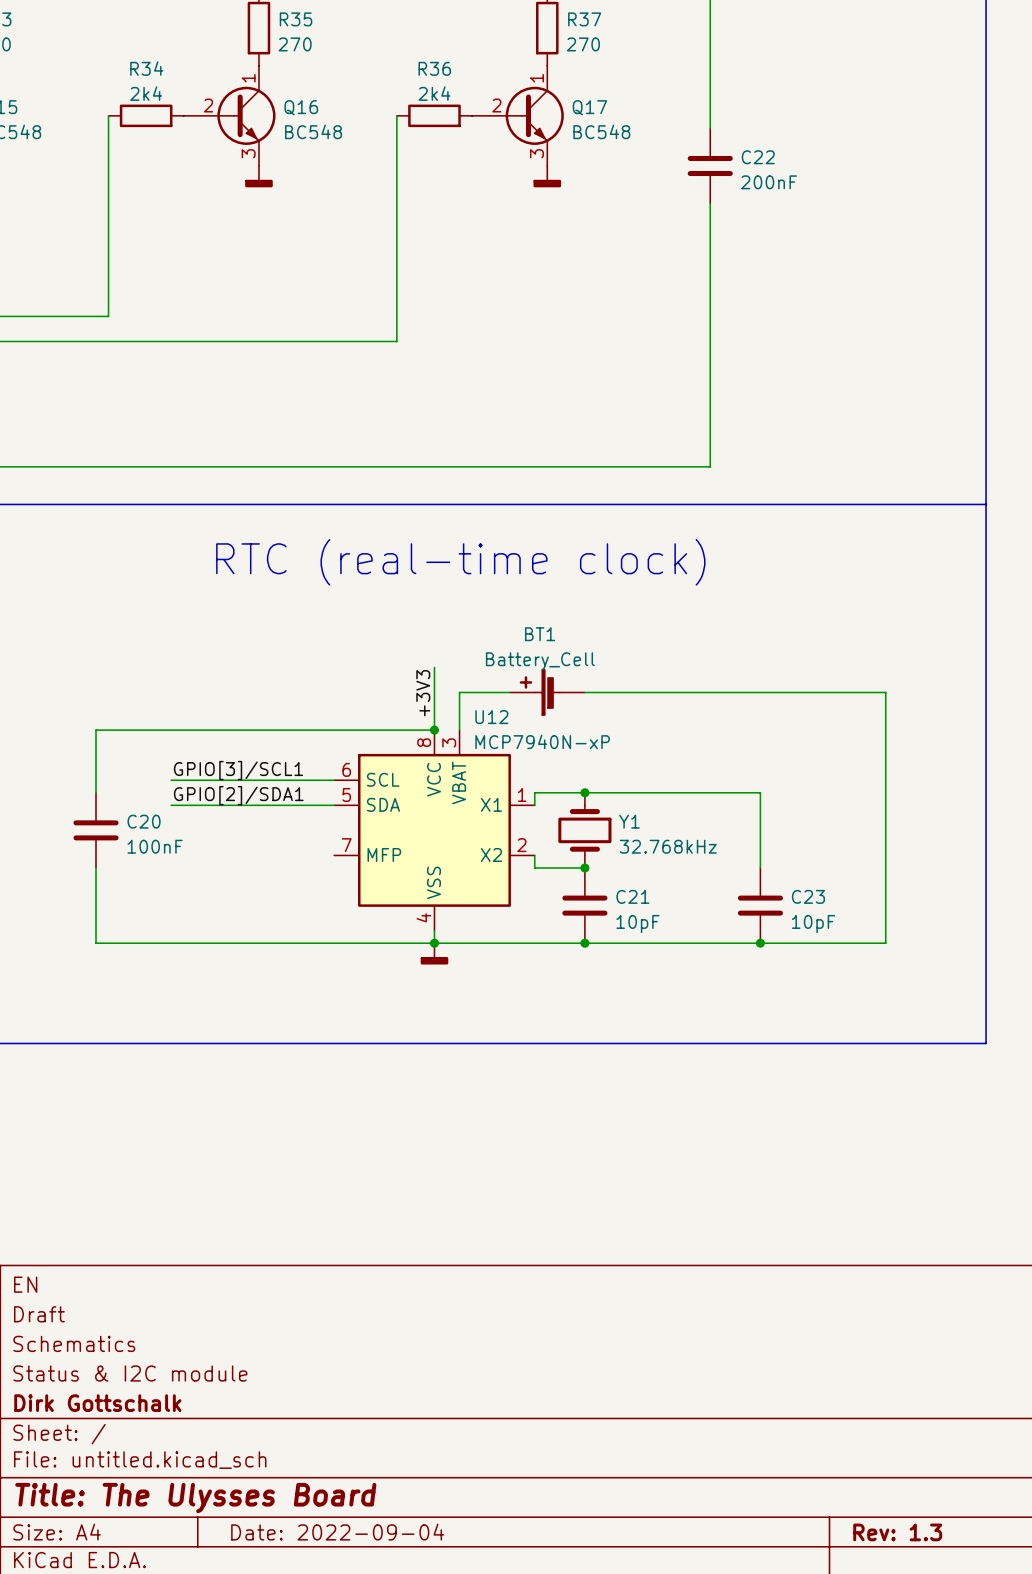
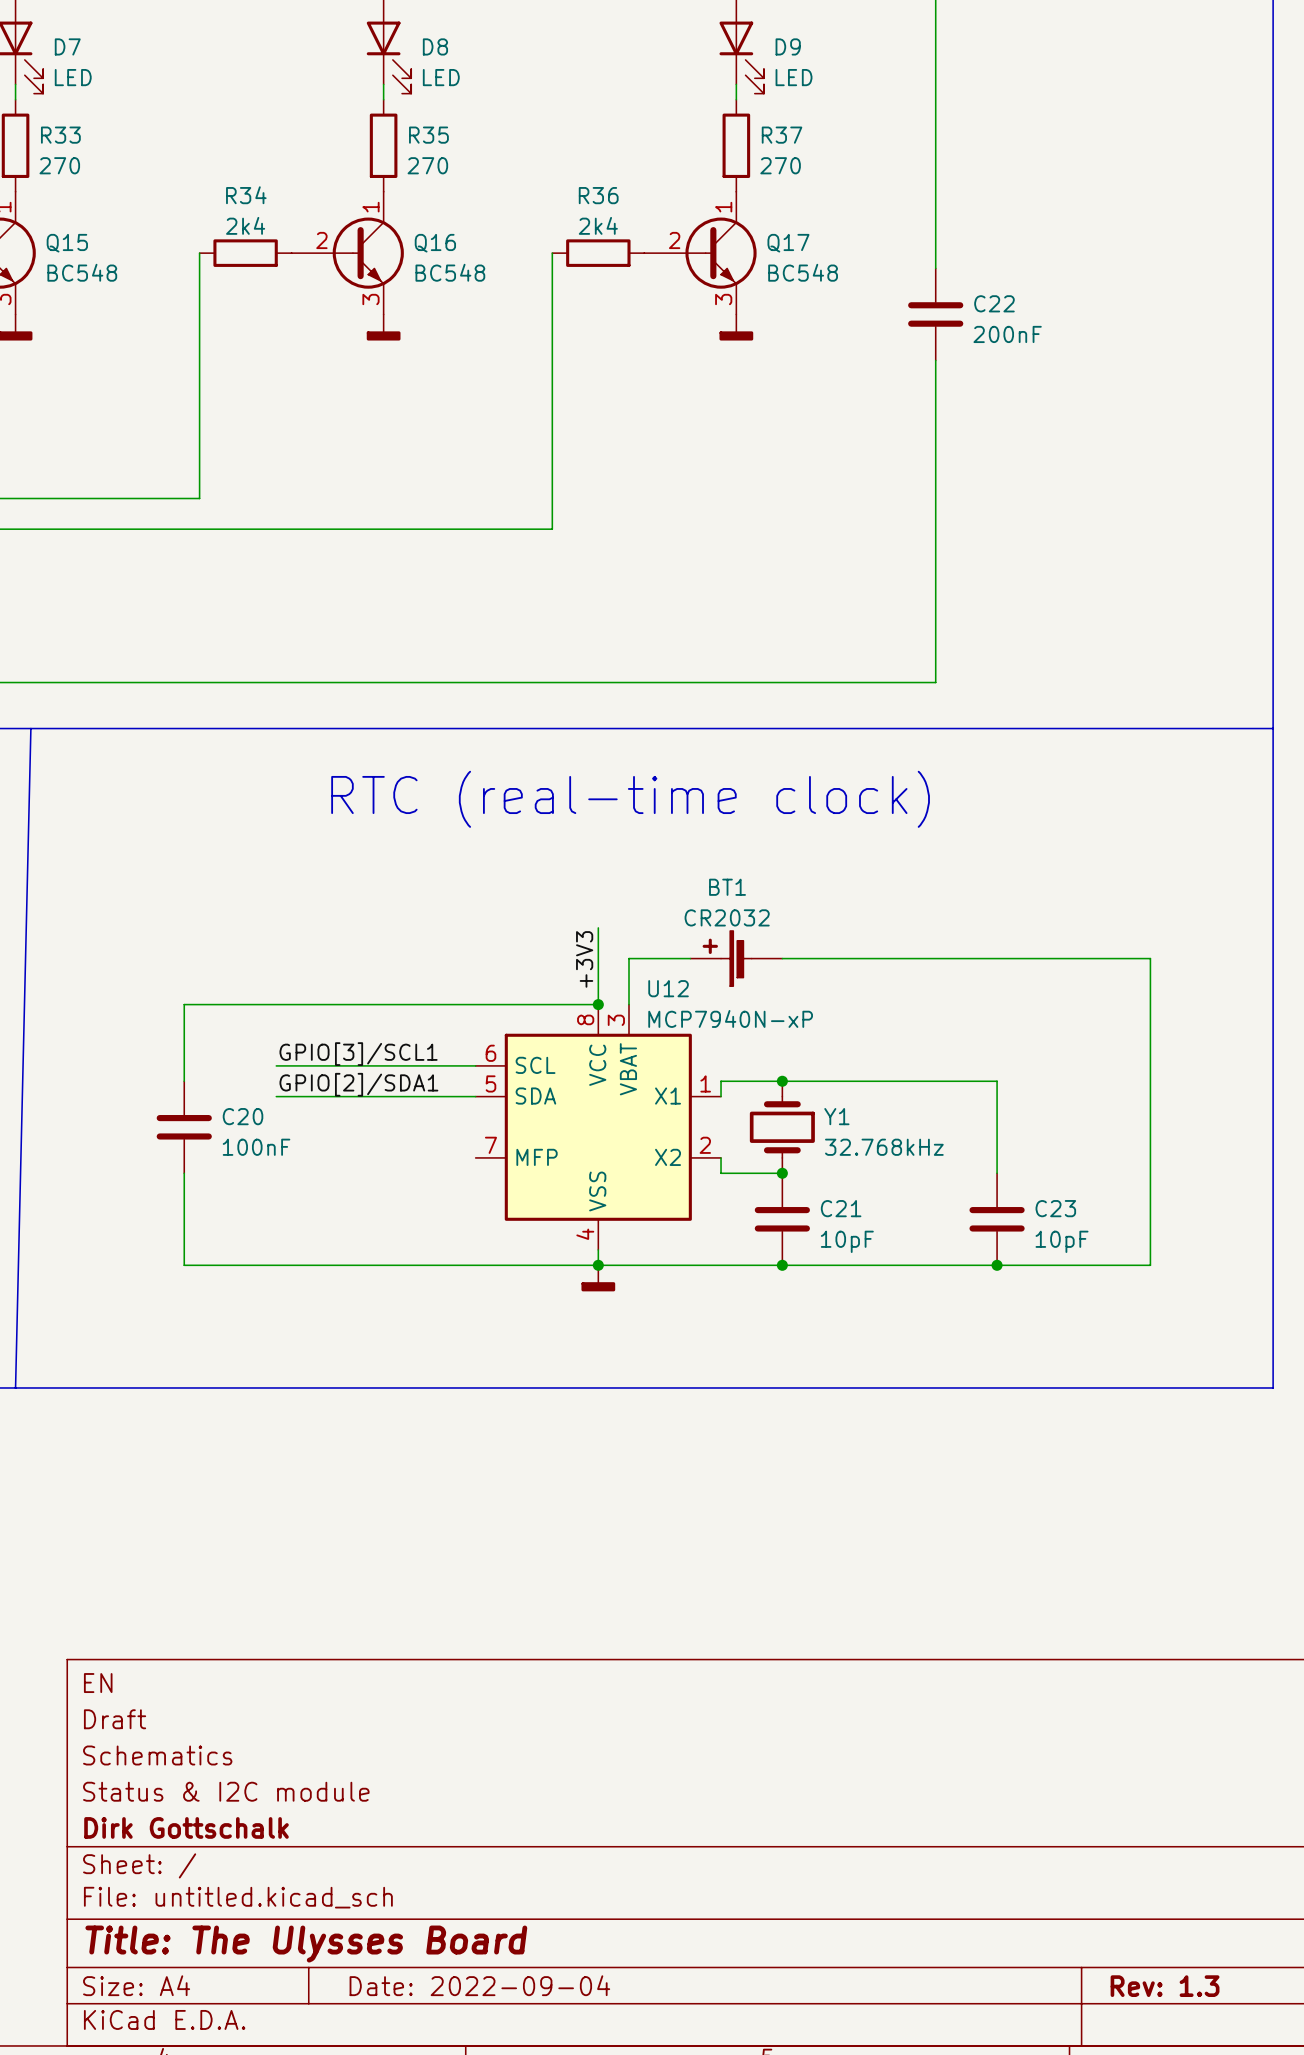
BT1 value: Battery_Cell (540, 661) -> CR2032 (727, 917)

